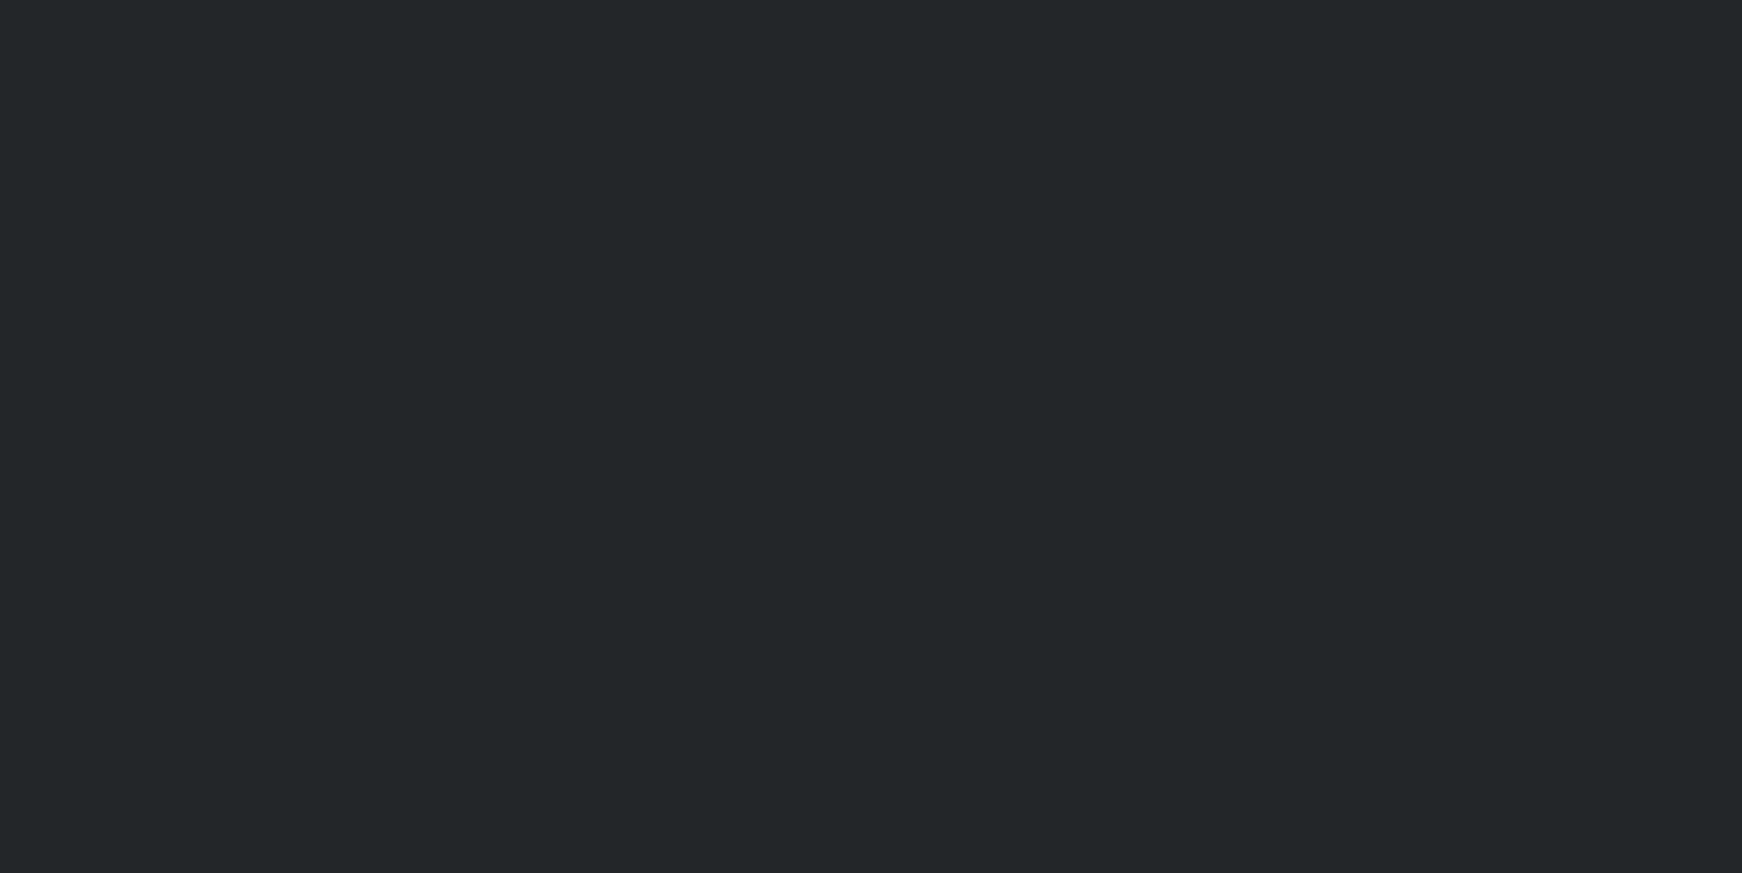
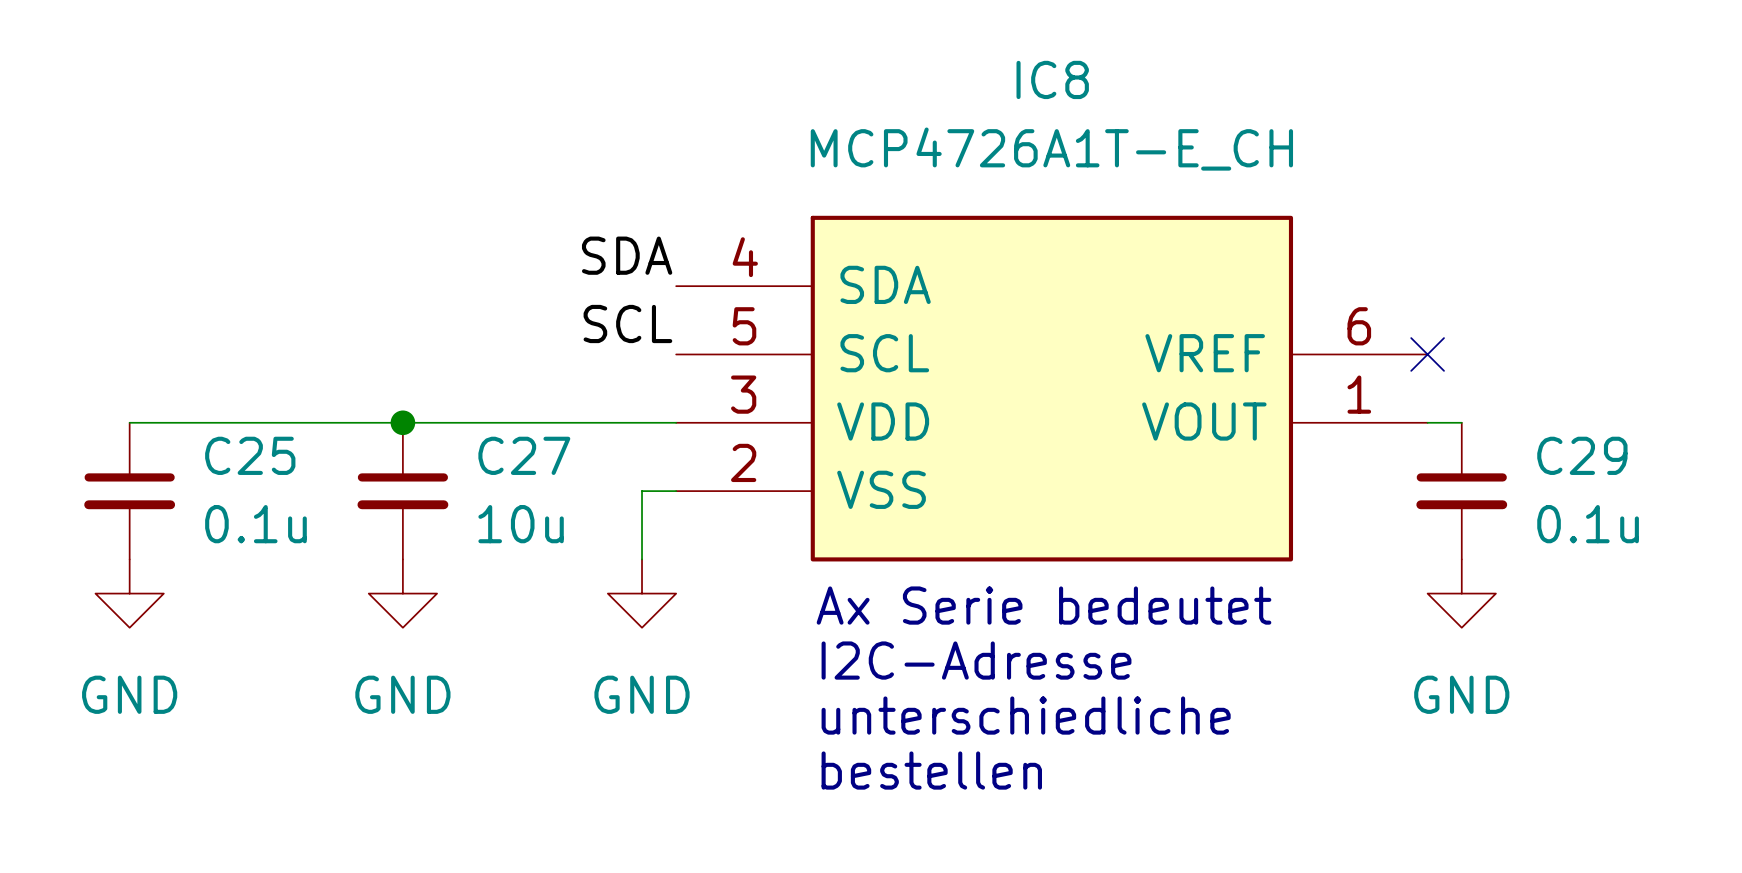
label: none -> SDA (627, 255)
label: none -> SCL (627, 323)
no-connect mark: none -> (1427, 354)
IC8: none -> MCP4726A1T-E_CH (1051, 388)
wire: none -> (129, 422) (676, 422)
junction: none -> (402, 422)
wire: none -> (1427, 422) (1461, 422)
C25: none -> 0.1u (129, 491)
C27: none -> 10u (402, 491)
wire: none -> (676, 491) (642, 491) (642, 559)
C29: none -> 0.1u (1461, 491)
power symbol: none -> GND (129, 593)
power symbol: none -> GND (402, 593)
power symbol: none -> GND (642, 593)
power symbol: none -> GND (1461, 593)
text: none -> Ax Serie bedeutet (1044, 605)
text: none -> I2C-Adresse (976, 660)
text: none -> unterschiedliche (1026, 715)
text: none -> bestellen (931, 770)

